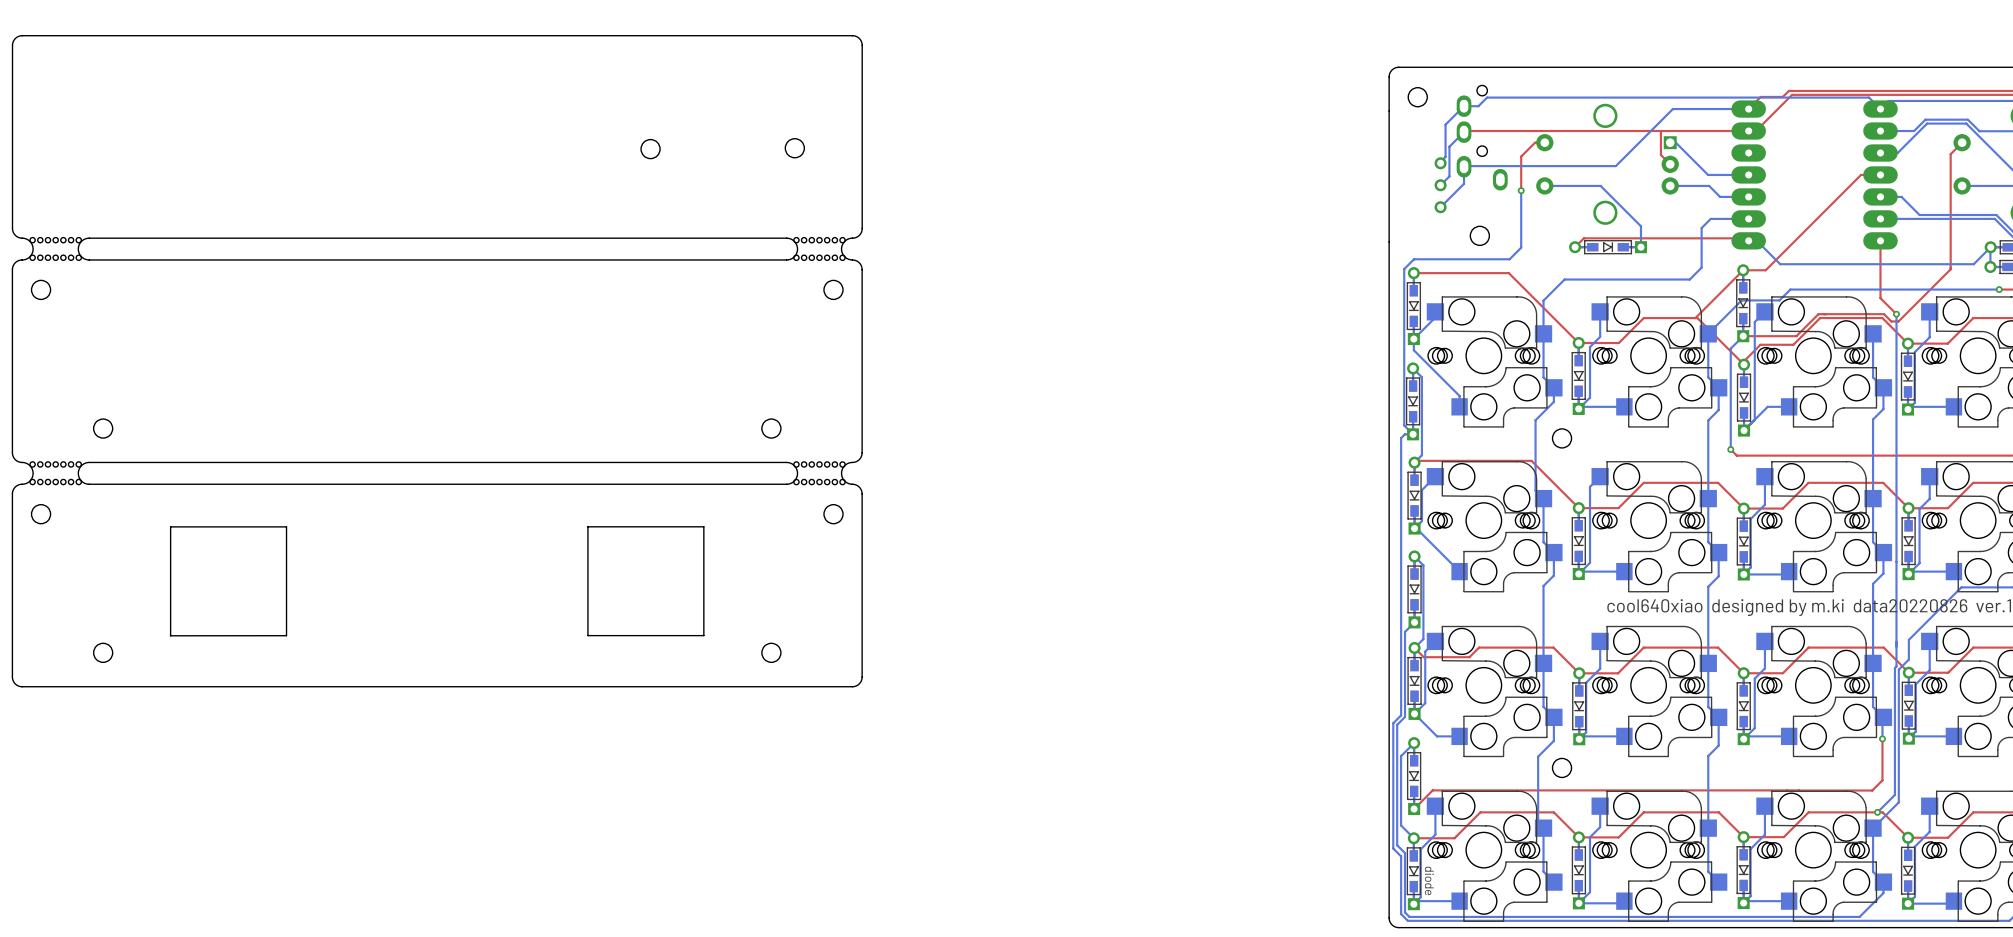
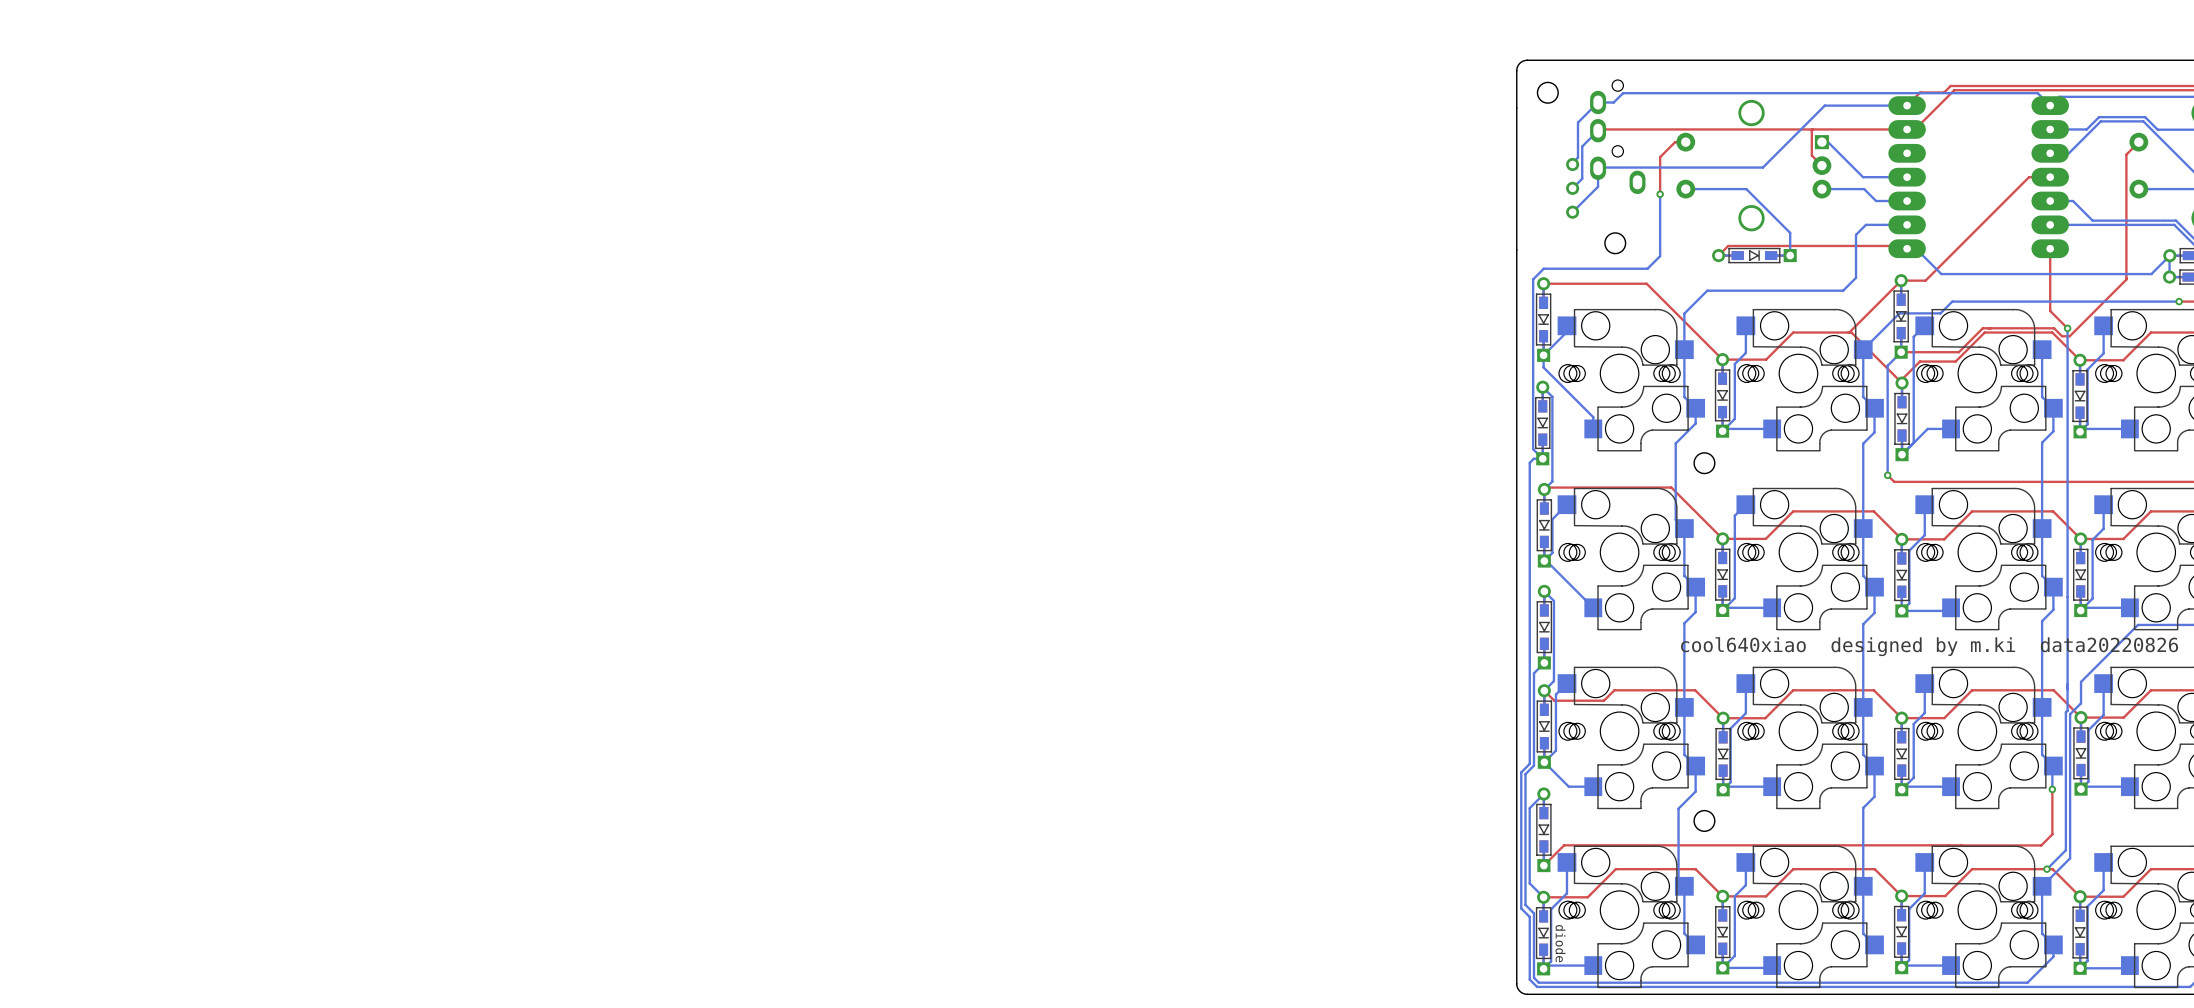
board edge: (852, 35) (22, 35) (16, 37) (12, 45) (12, 229) (17, 236) (29, 240) (33, 249) (29, 257) (17, 261) (12, 268) (12, 452) (16, 460) (30, 466) (33, 473) (29, 481) (17, 485) (12, 492) (12, 677) (14, 682) (22, 686) (852, 686) (858, 684) (862, 677) (862, 492) (857, 485) (845, 481) (841, 473) (844, 466) (858, 460) (862, 452) (862, 268) (857, 261) (845, 257) (841, 249) (844, 241) (858, 236) (862, 228) (862, 45) (859, 38) (852, 35) -> none
round board edge: [640, 138, 661, 160] -> none
round board edge: [784, 138, 806, 159] -> none
board edge: (786, 238) (89, 238) (82, 240) (78, 249) (81, 256) (89, 259) (786, 259) (794, 256) (797, 249) (794, 241) (786, 238) -> none
part: (55, 248) -> none
part: (819, 248) -> none
round board edge: [30, 279, 52, 301] -> none
round board edge: [823, 279, 844, 301] -> none
round board edge: [92, 418, 114, 439] -> none
round board edge: [761, 418, 782, 439] -> none
board edge: (786, 462) (89, 462) (82, 465) (78, 473) (81, 480) (89, 484) (786, 484) (794, 481) (797, 473) (794, 465) (786, 462) -> none
part: (55, 473) -> none
part: (819, 473) -> none
round board edge: [30, 504, 52, 525] -> none
round board edge: [823, 504, 844, 525] -> none
board edge: (286, 526) (170, 526) (170, 635) (286, 635) (286, 526) -> none
board edge: (703, 526) (703, 635) (587, 635) (587, 526) (703, 526) -> none
round board edge: [92, 642, 114, 663] -> none
round board edge: [761, 642, 782, 663] -> none

